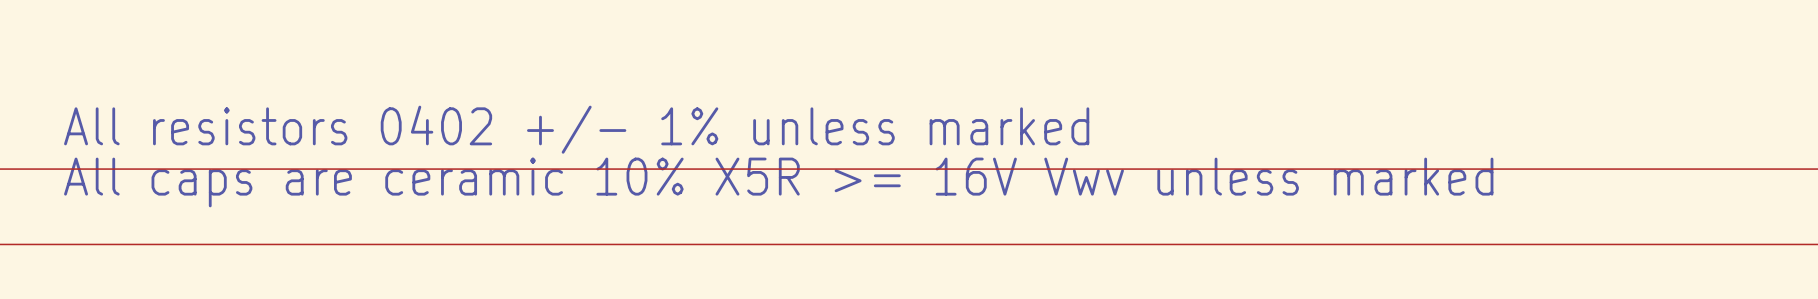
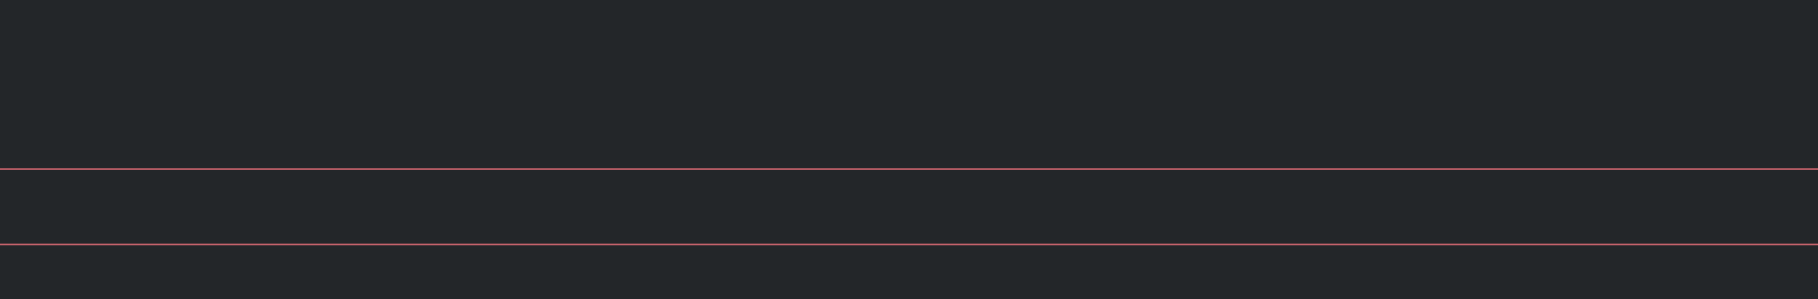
text: All resistors 0402 +/- 1% unless marked (576, 129) -> none
text: All caps are ceramic 10% X5R >= 16V Vwv unless marked (778, 182) -> none

